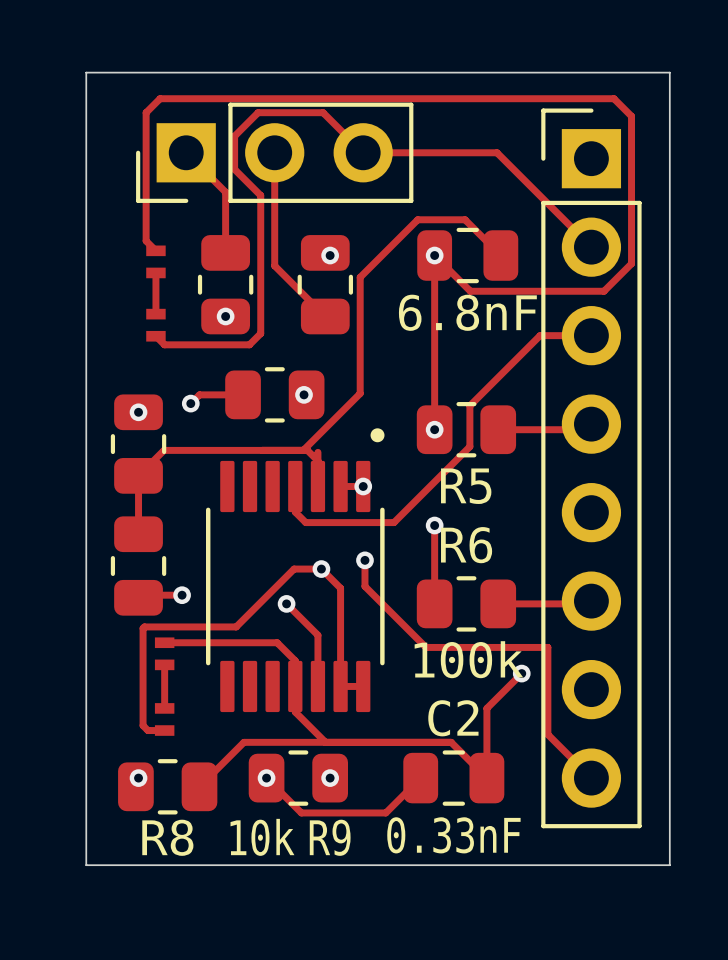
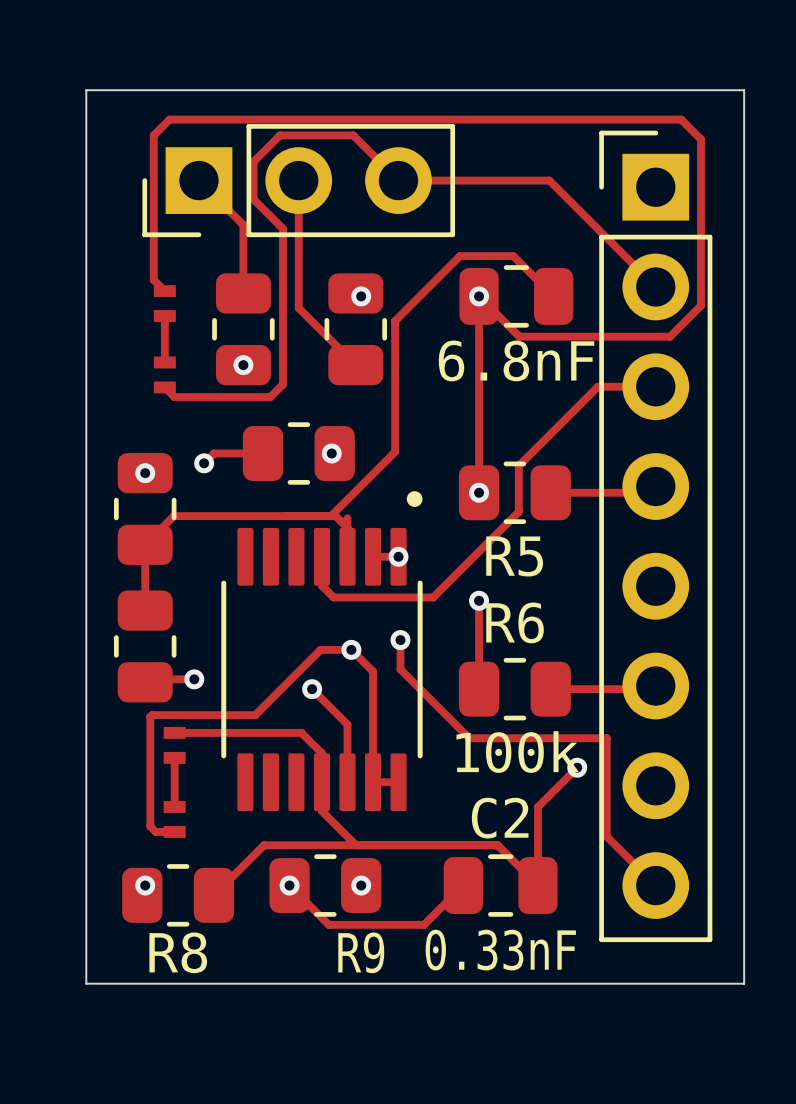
R9 value: 10k (262, 837) -> none

